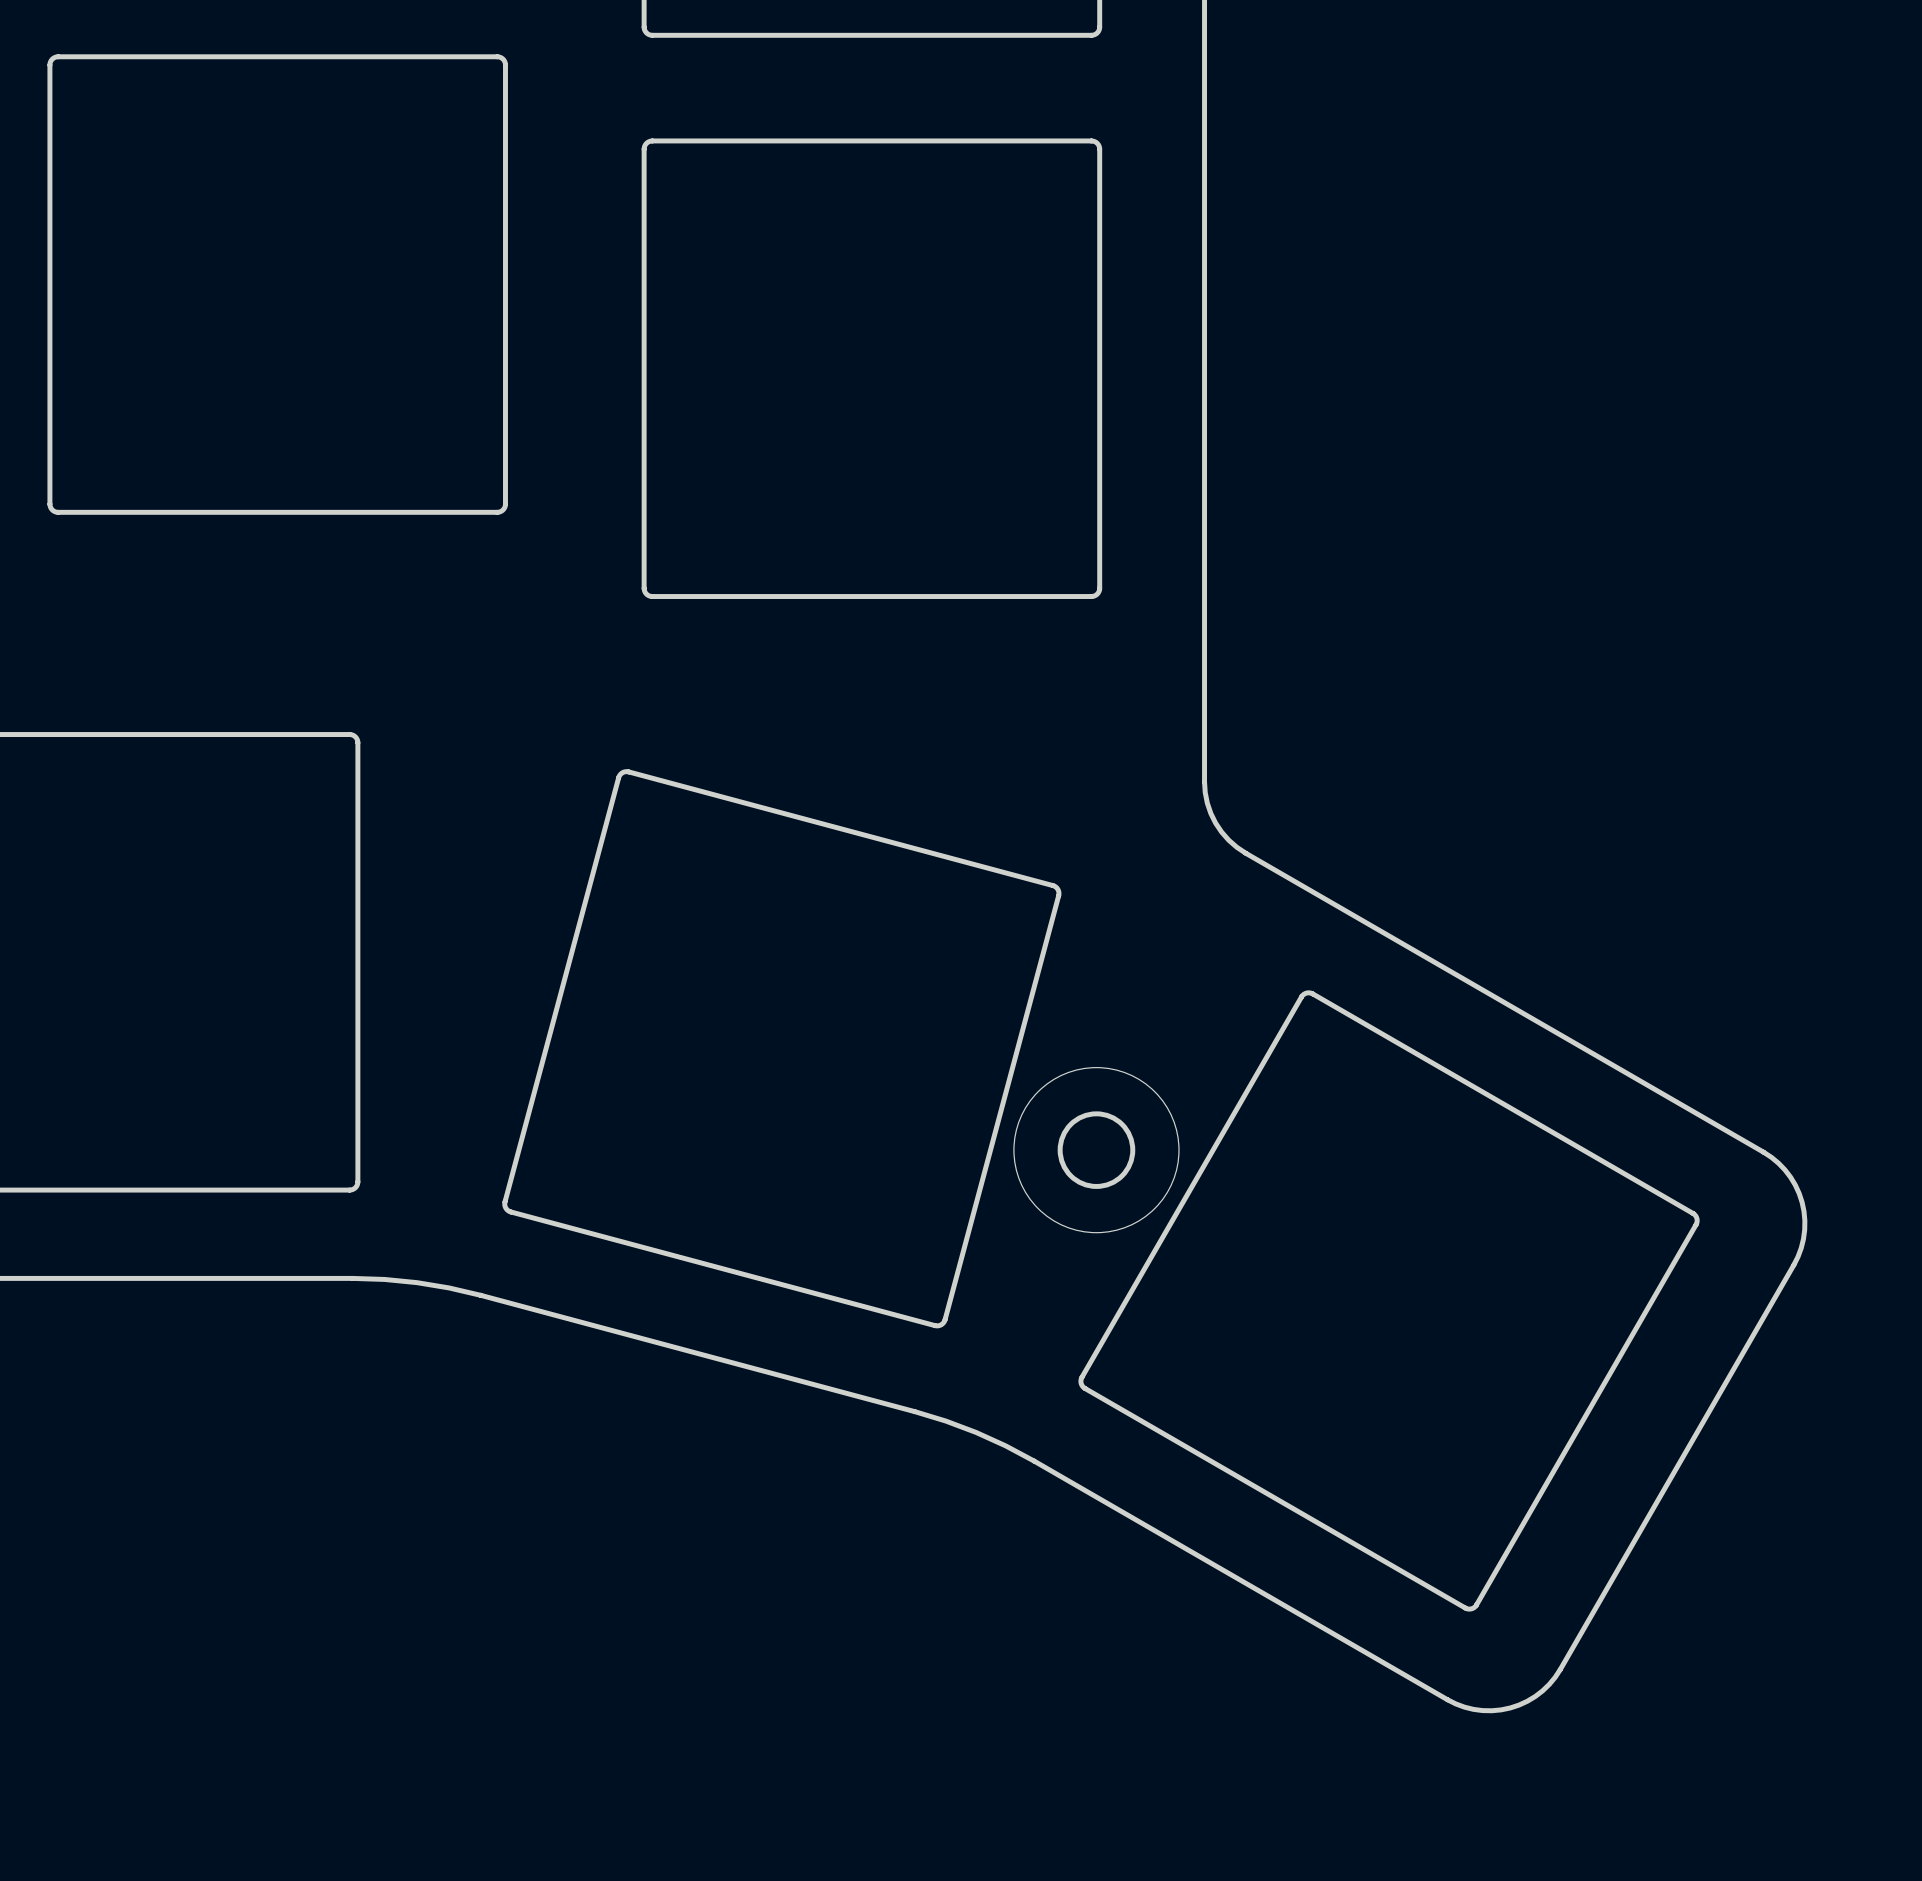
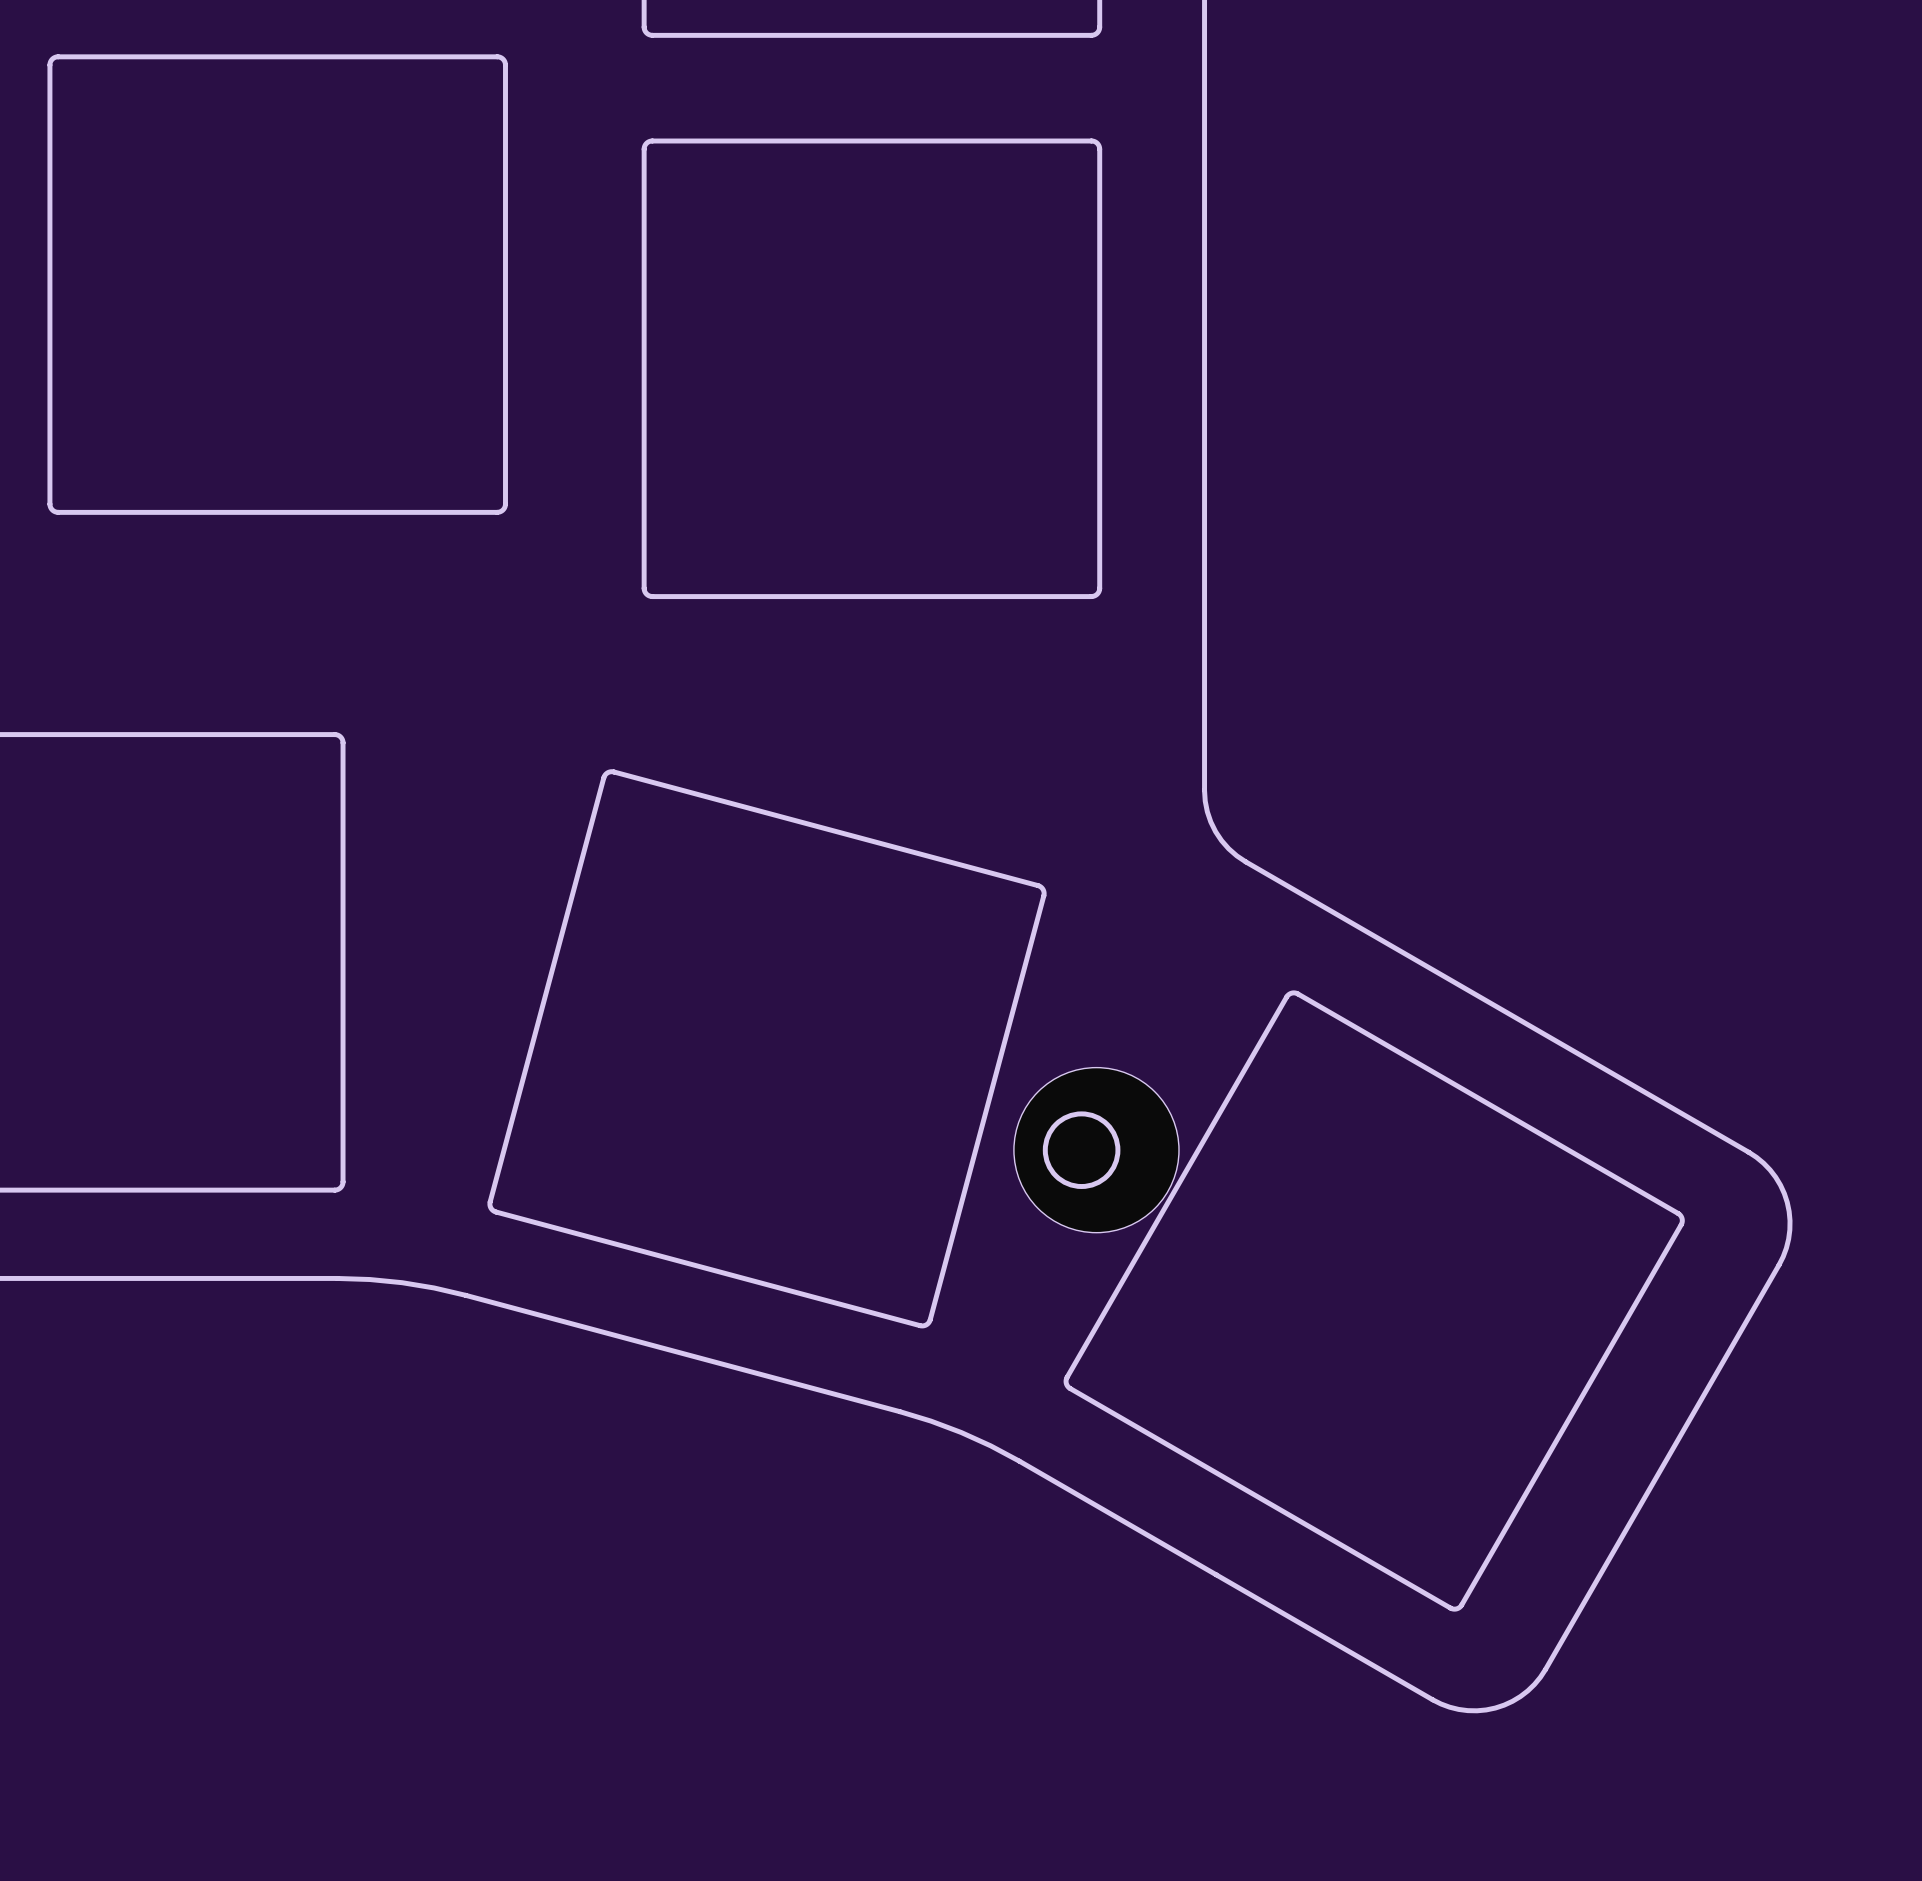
board edge: (334, 734) (352, 734) (356, 737) (357, 742) (357, 1181) (356, 1186) (352, 1189) (334, 1190) -> (334, 734) (340, 736) (343, 742) (343, 1181) (340, 1187) (334, 1190)
board edge: (628, 771) (1052, 885) (1057, 889) (1058, 895) (945, 1319) (941, 1324) (934, 1325) (510, 1211) (505, 1208) (505, 1201) (618, 777) (622, 772) (625, 771) (627, 771) (628, 771) -> (613, 771) (1038, 885) (1043, 889) (1043, 895) (930, 1319) (926, 1324) (920, 1325) (496, 1212) (491, 1208) (490, 1201) (603, 777) (607, 772) (610, 771) (611, 771) (612, 771) (613, 771)
board edge: (1204, 781) (1210, 813) (1221, 832) (1236, 847) (1763, 1152) (1784, 1169) (1799, 1193) (1804, 1211) (1804, 1229) (1801, 1248) (1793, 1264) (1560, 1669) (1542, 1690) (1527, 1701) (1510, 1707) (1491, 1710) (1473, 1709) (1455, 1703) (1034, 1461) (976, 1432) (945, 1421) (480, 1295) (417, 1282) (337, 1278) -> (1204, 781) (1205, 801) (1210, 821) (1221, 840) (1236, 855) (1748, 1152) (1770, 1169) (1784, 1193) (1789, 1211) (1789, 1229) (1786, 1248) (1779, 1265) (1545, 1669) (1534, 1684) (1512, 1701) (1495, 1708) (1477, 1710) (1458, 1709) (1440, 1703) (1019, 1461) (990, 1445) (930, 1421) (465, 1295) (402, 1282) (337, 1278)
board edge: (1312, 993) (1693, 1213) (1696, 1218) (1696, 1224) (1476, 1604) (1471, 1608) (1465, 1607) (1085, 1388) (1081, 1383) (1082, 1377) (1301, 996) (1306, 993) (1312, 993) -> (1297, 993) (1678, 1213) (1682, 1218) (1681, 1224) (1461, 1605) (1456, 1608) (1450, 1608) (1070, 1388) (1066, 1383) (1067, 1377) (1286, 997) (1291, 993) (1297, 993)
round board edge position: (1096, 1150) -> (1081, 1150)

